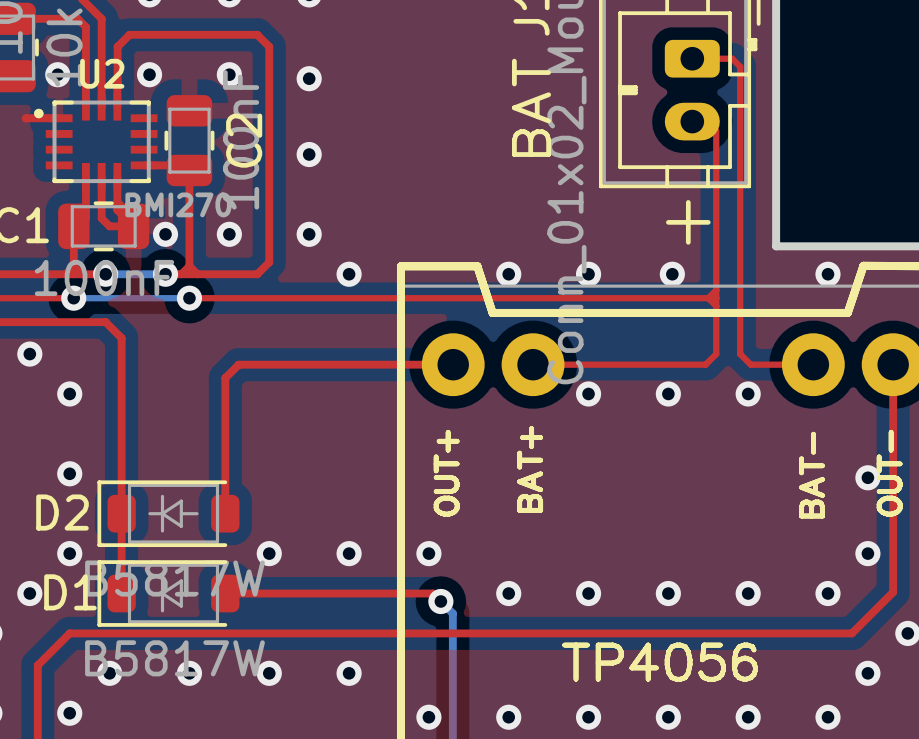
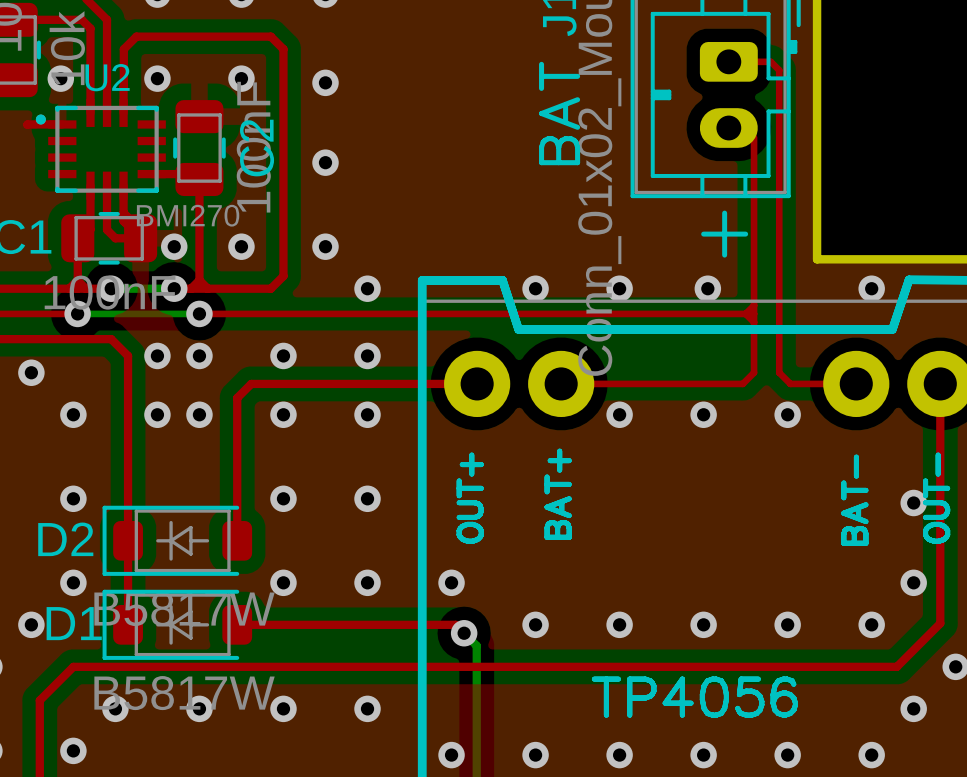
via: none -> (157, 355)
via: none -> (199, 355)
via: none -> (283, 355)
via: none -> (367, 355)
via: none -> (157, 414)
via: none -> (199, 414)
via: none -> (283, 414)
via: none -> (367, 414)
via: none -> (283, 498)
via: none -> (367, 498)

